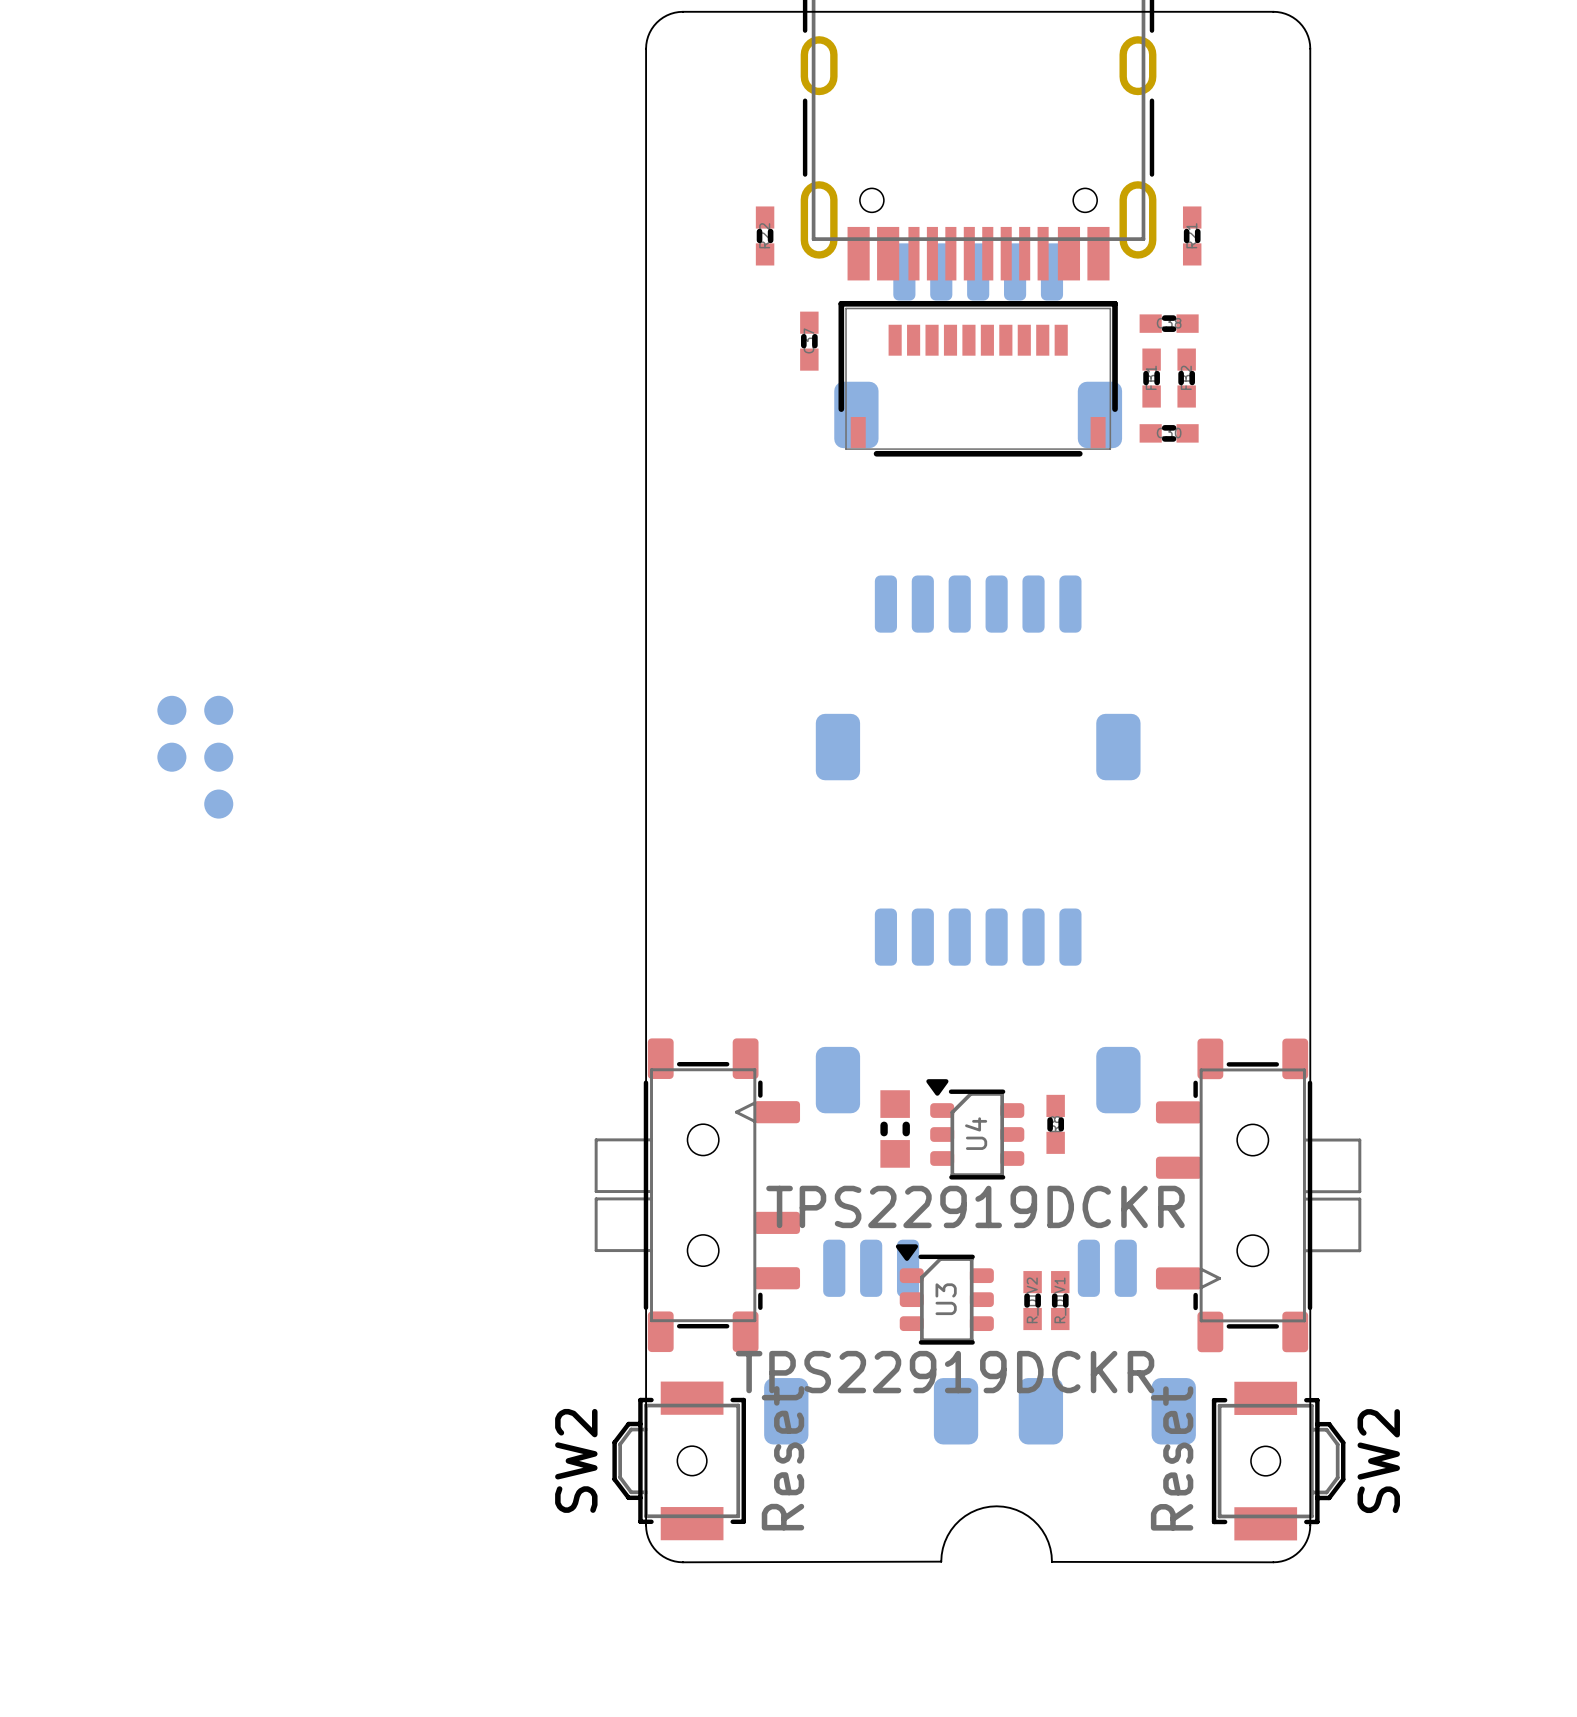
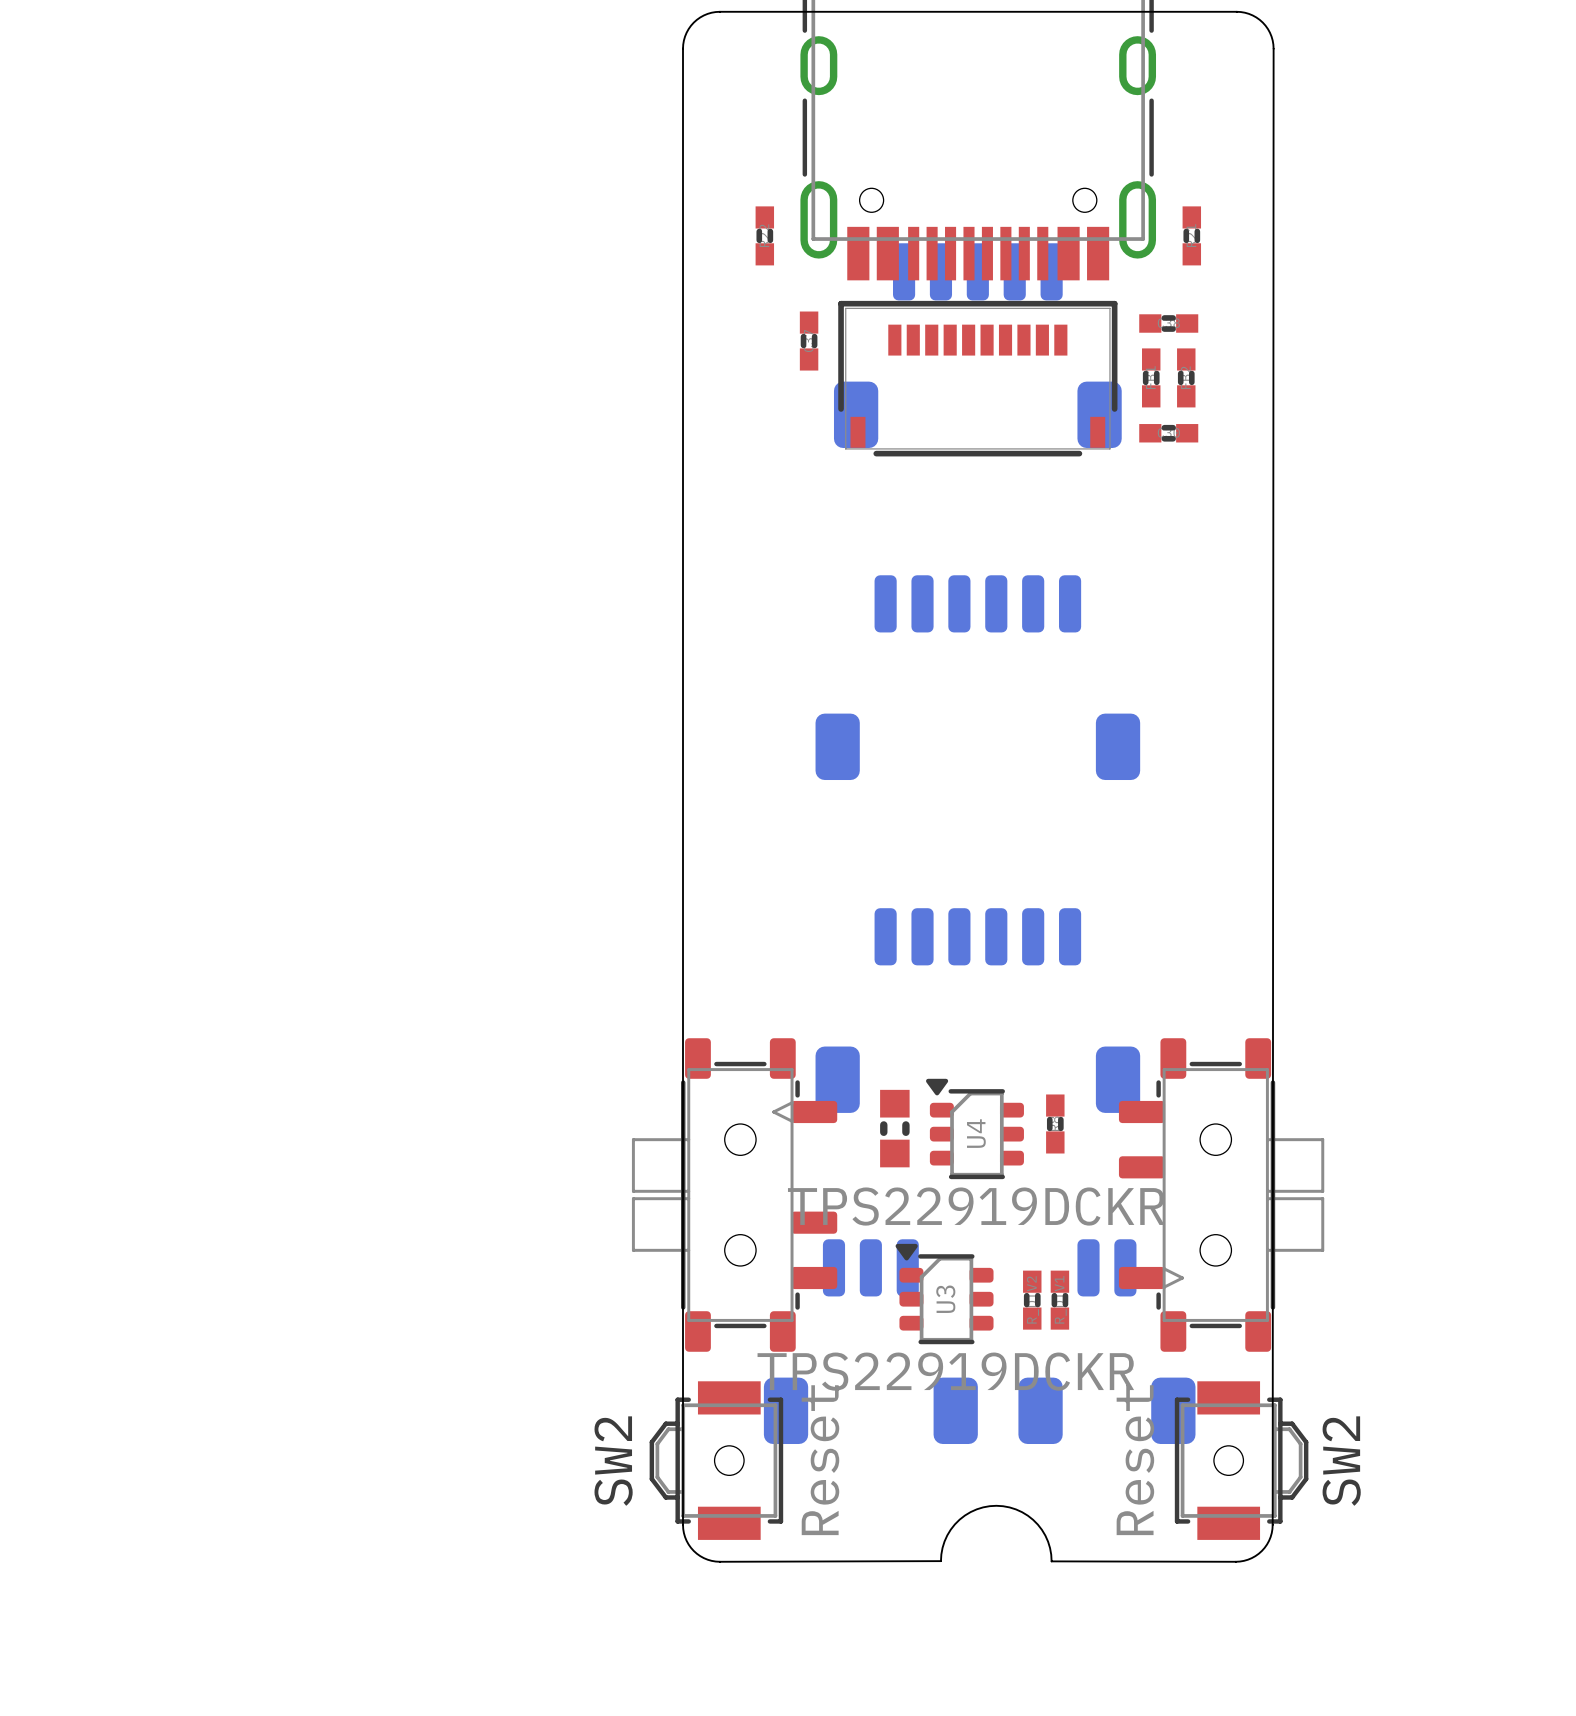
board edge: (720, 11) (678, 12) (666, 15) (651, 29) (646, 48) (646, 1529) (649, 1541) (656, 1551) (666, 1558) (678, 1562) (941, 1561) -> (719, 11) (703, 15) (693, 22) (686, 32) (683, 48) (683, 1529) (686, 1540) (693, 1550) (703, 1558) (715, 1561) (940, 1561)
board edge: (1237, 11) (1277, 12) (1289, 15) (1304, 29) (1310, 48) (1310, 1529) (1306, 1541) (1299, 1551) (1289, 1558) (1277, 1562) (1051, 1561) -> (1236, 11) (1248, 13) (1262, 22) (1271, 36) (1273, 48) (1272, 1529) (1269, 1540) (1261, 1550) (1251, 1558) (1239, 1561) (1051, 1561)
part: (195, 757) -> none
part position: (697, 1195) -> (734, 1195)
part position: (1258, 1195) -> (1221, 1195)
SW2 position: (679, 1460) -> (716, 1460)
SW2 position: (1278, 1461) -> (1241, 1460)

